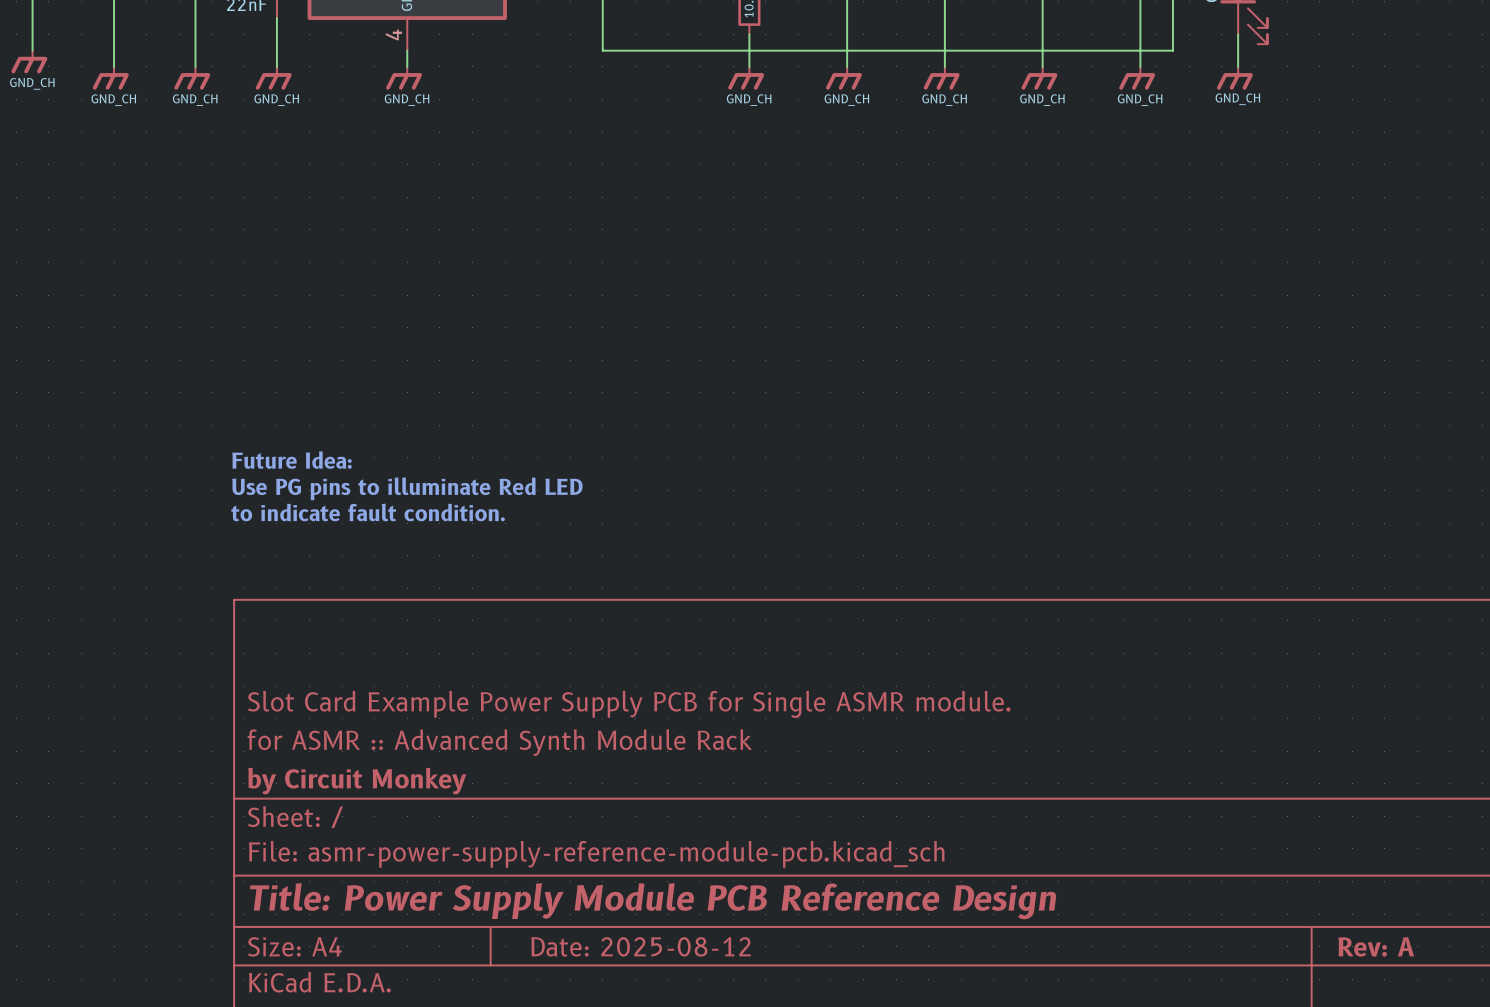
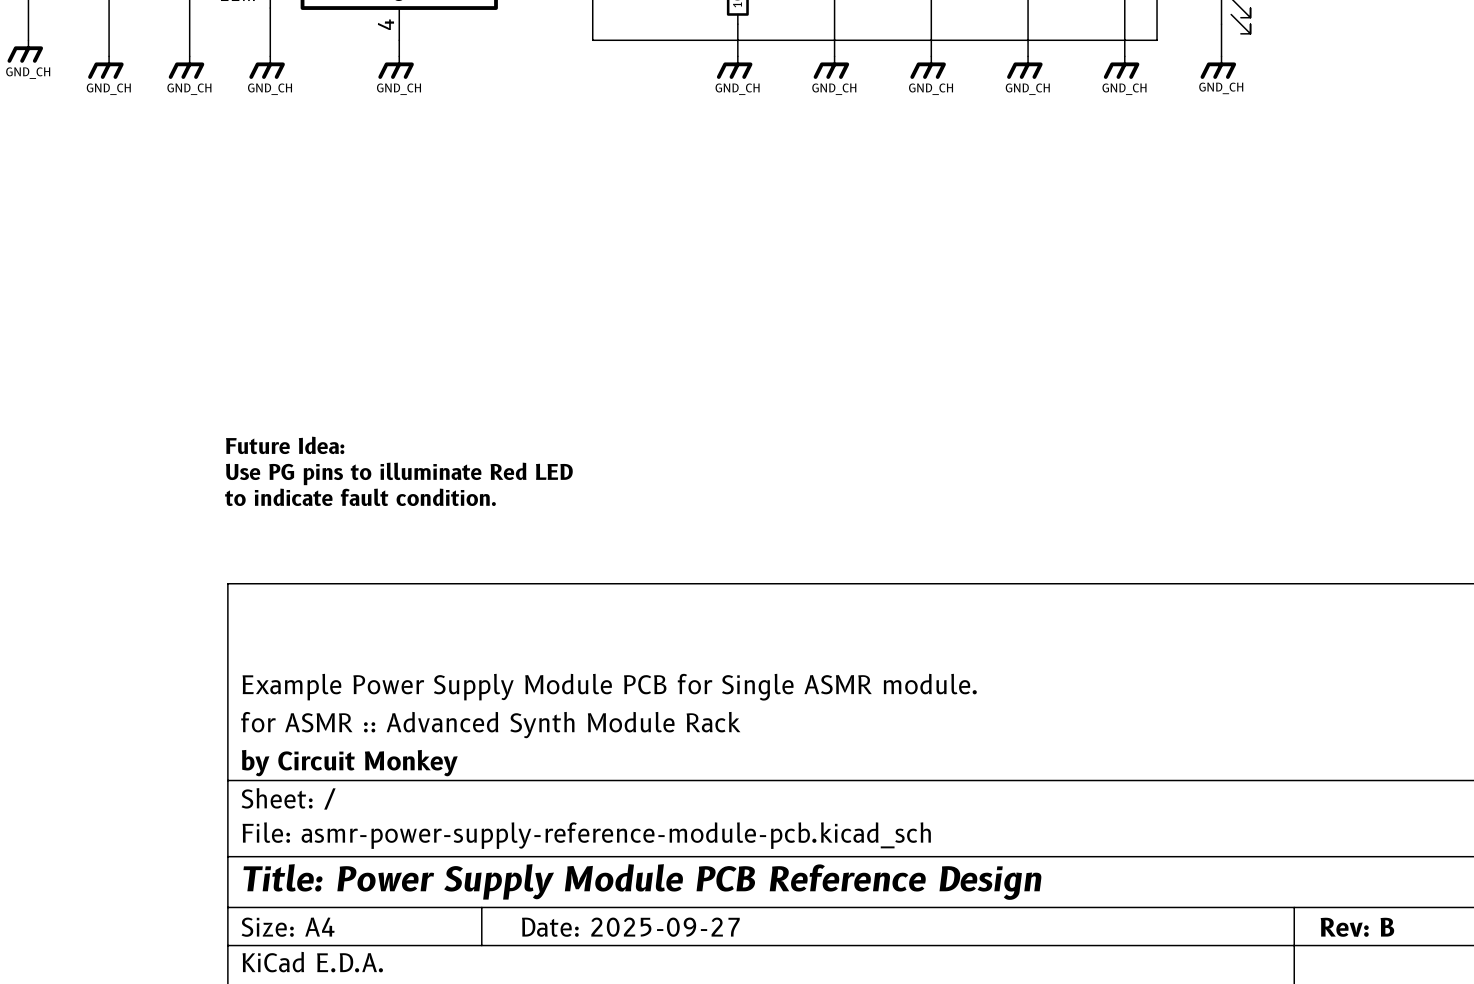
title block: Slot Card Example Power Supply PCB for Single ASMR module. (629, 704) -> Example Power Supply Module PCB for Single ASMR module. (609, 687)
title block: Date: 2025-08-12 (641, 946) -> Date: 2025-09-27 (630, 927)
title block: Rev: A (1376, 946) -> Rev: B (1357, 927)

